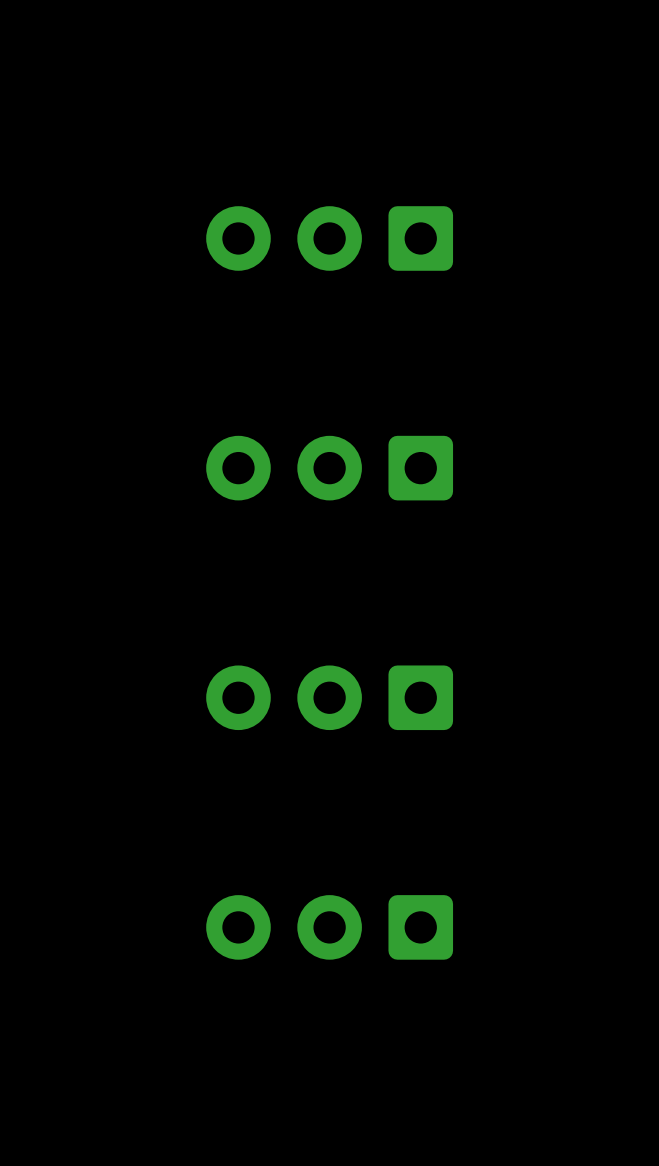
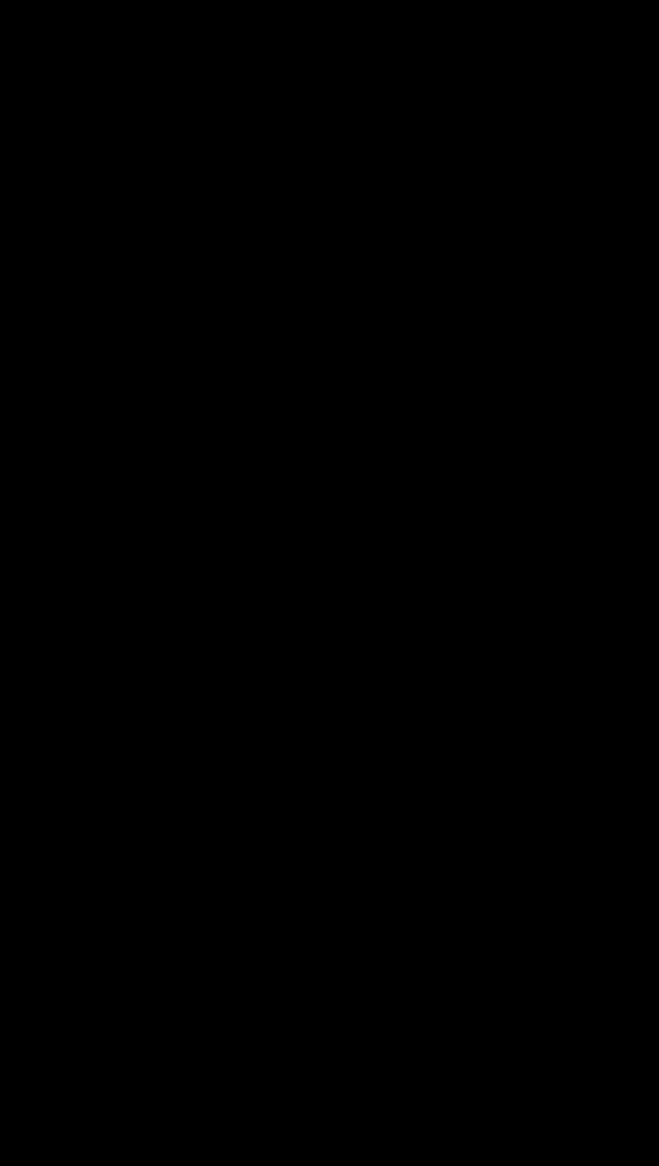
part: (329, 238) -> none
part: (329, 468) -> none
part: (329, 697) -> none
part: (329, 927) -> none

